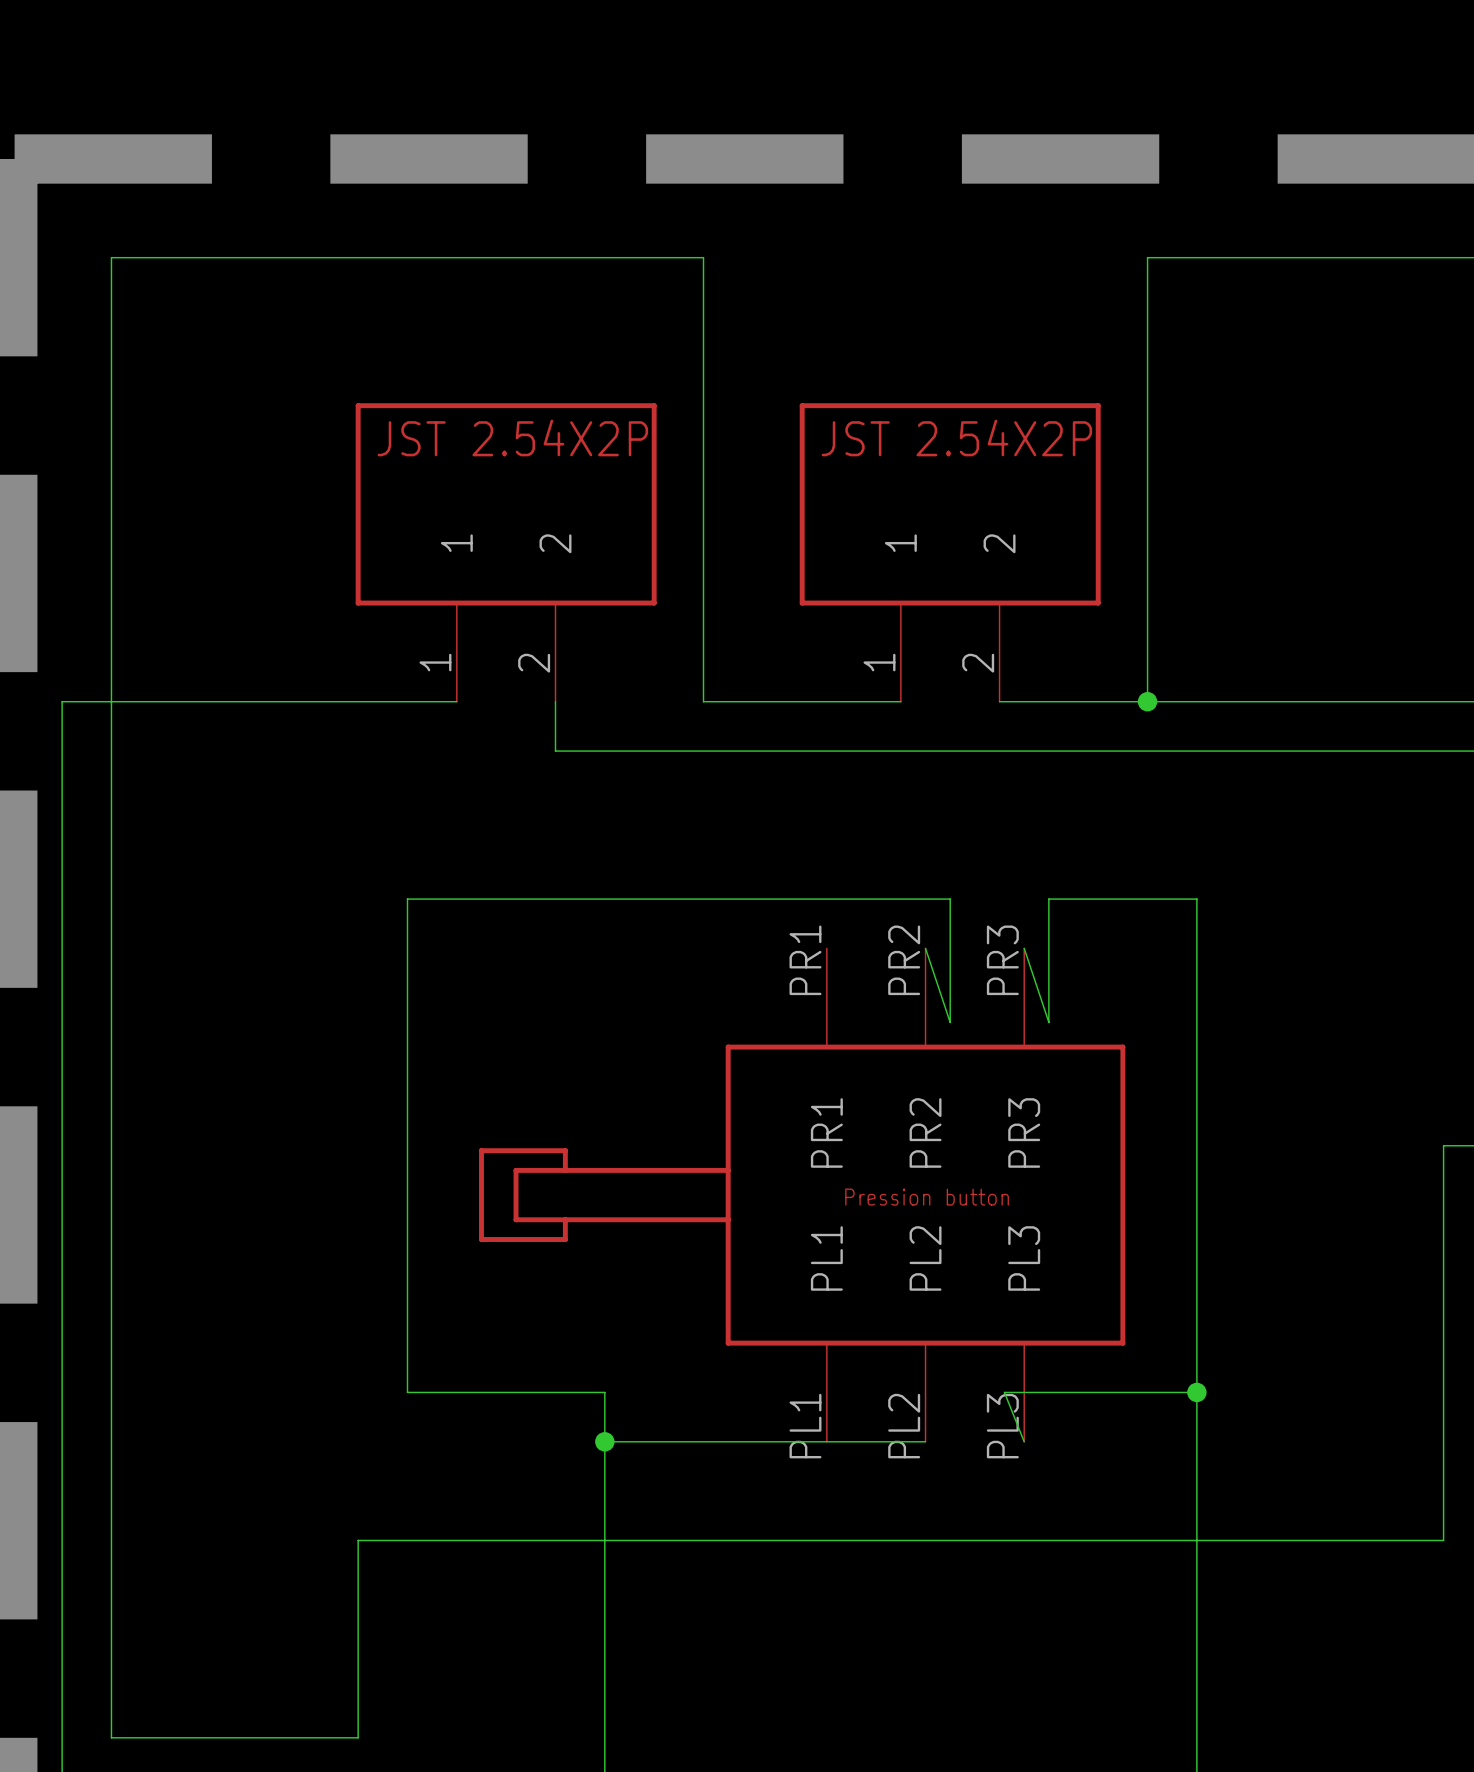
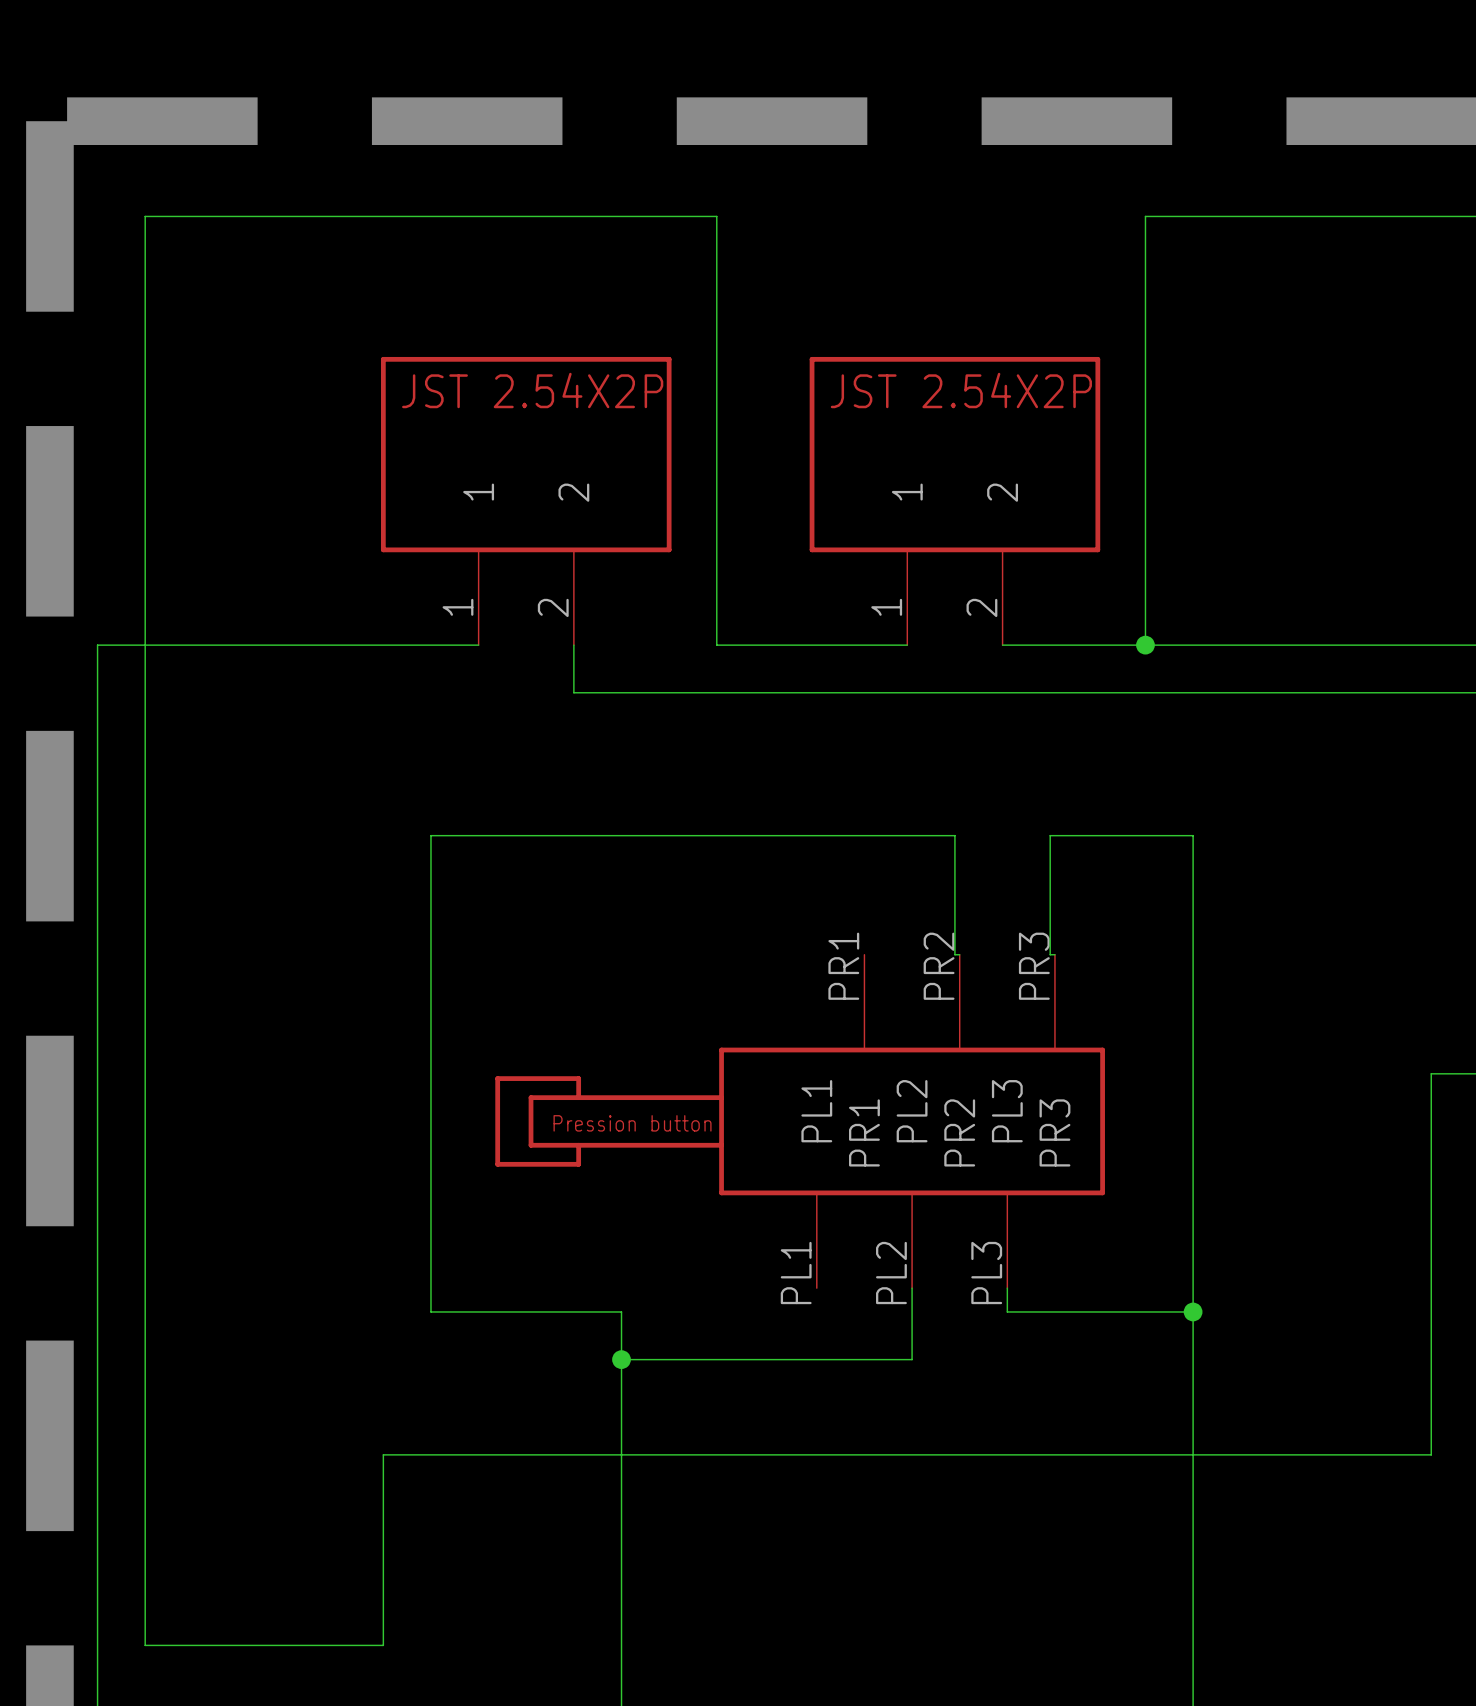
part symbol: [479, 948, 1126, 1442] -> [495, 954, 1105, 1289]
wire: (925, 948) (950, 1022) -> (959, 954) (954, 954)
wire: (1024, 948) (1048, 1022) -> (1054, 954) (1050, 954)
wire: (1004, 1392) (1024, 1441) -> (1007, 1311) (1007, 1288)
wire: (905, 1441) (925, 1441) -> (912, 1359) (912, 1288)

